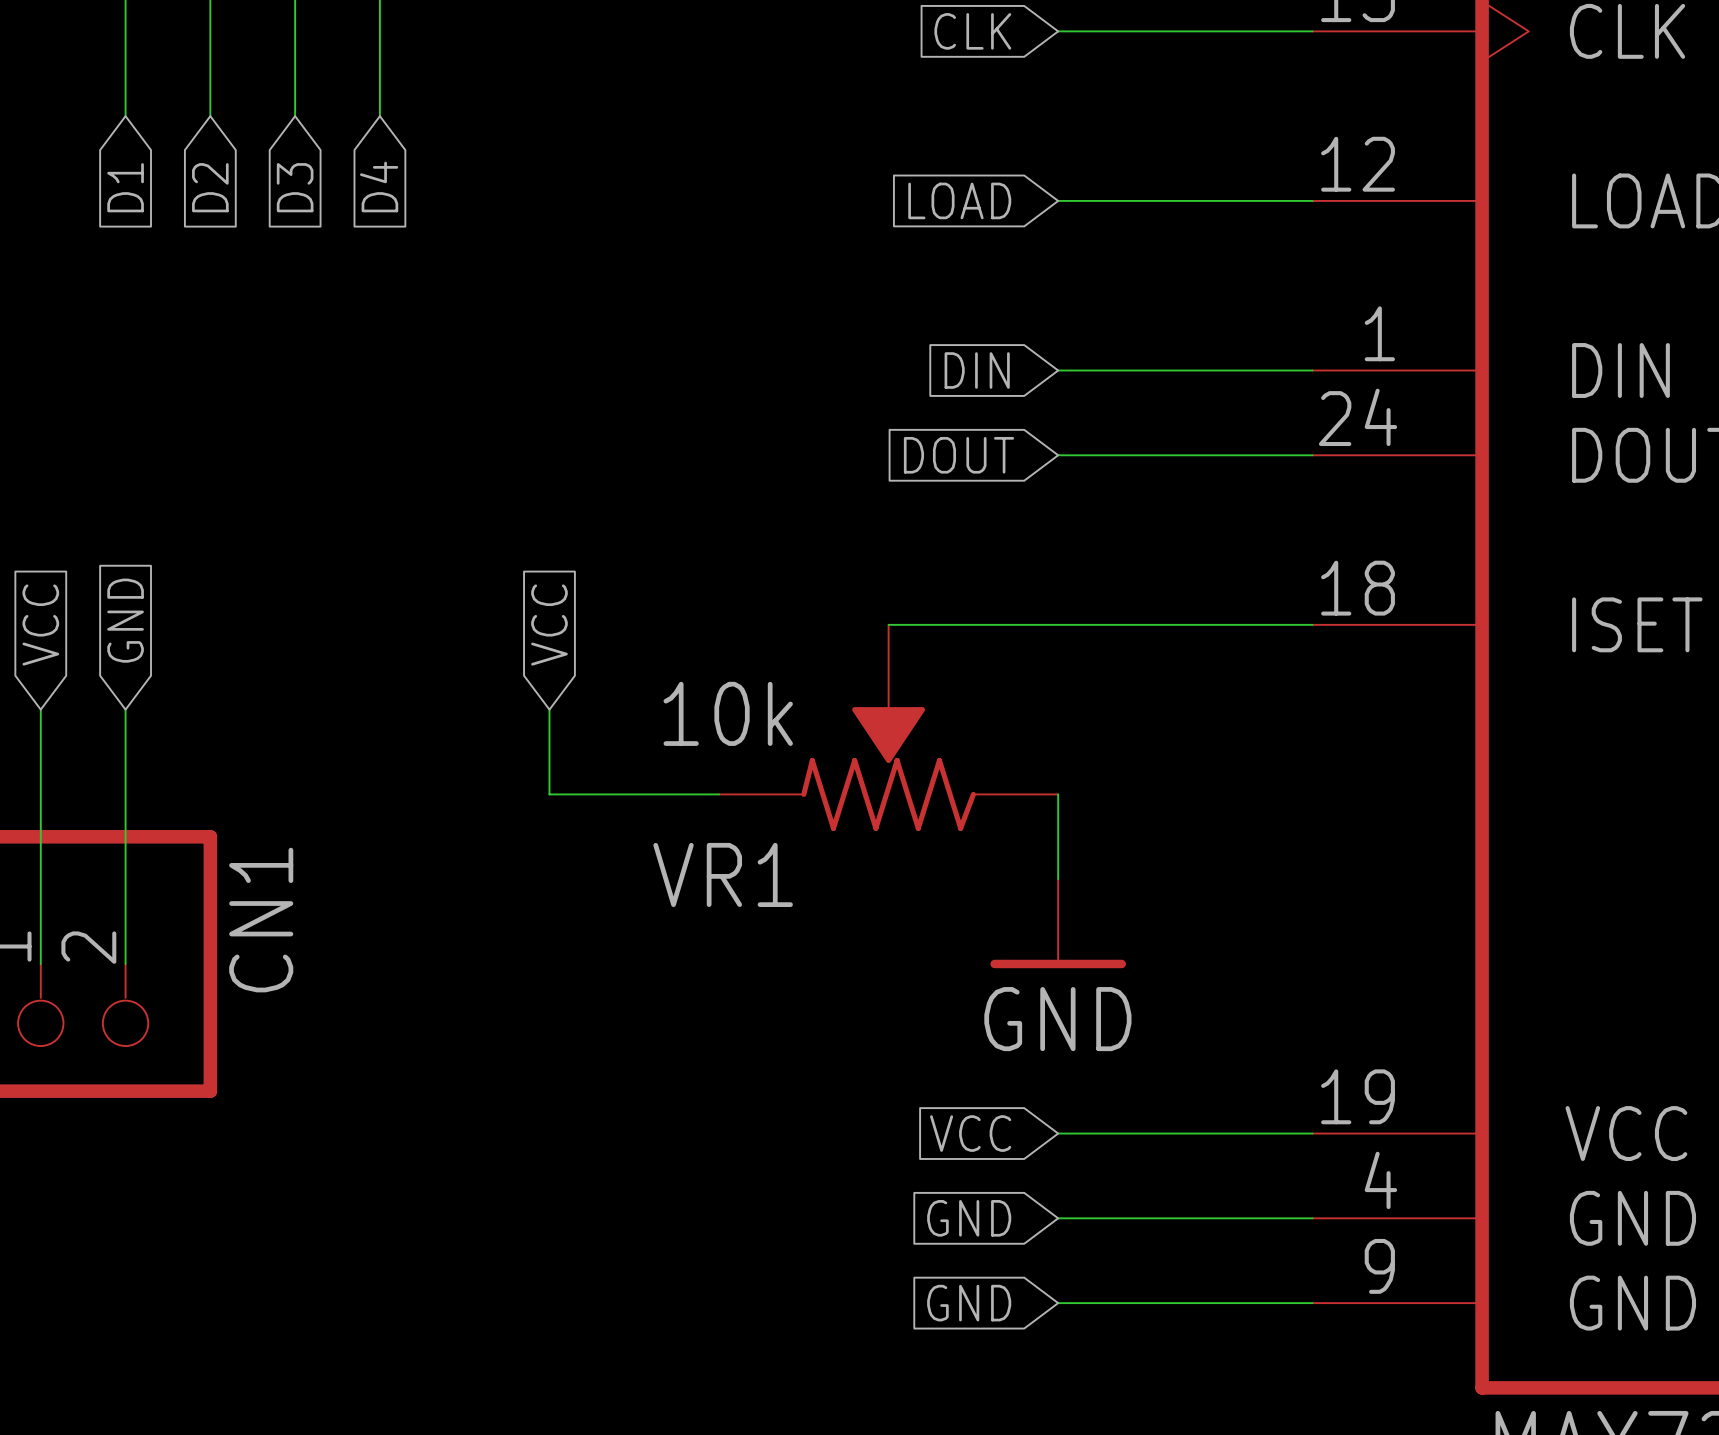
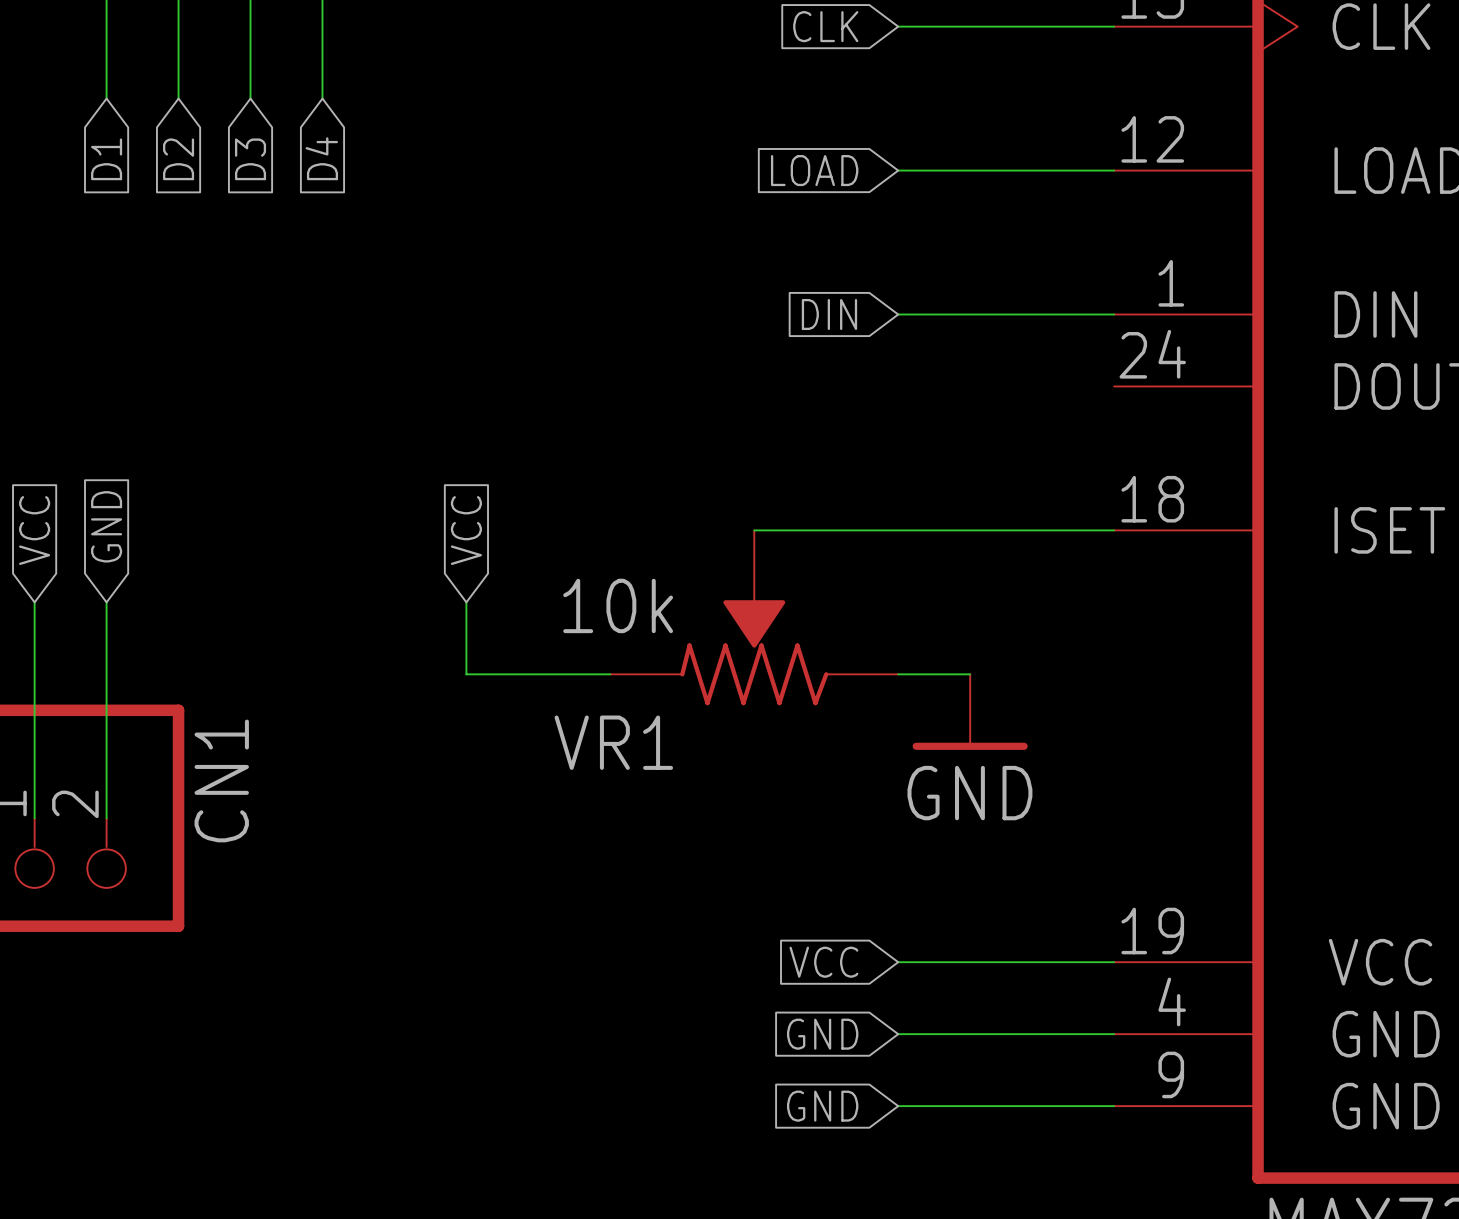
global label: DOUT (959, 455) -> none
wire: (1058, 455) (1312, 455) -> none
wire: (1058, 794) (1058, 879) -> (898, 674) (970, 674)
power symbol position: GND (1058, 923) -> GND (970, 712)

